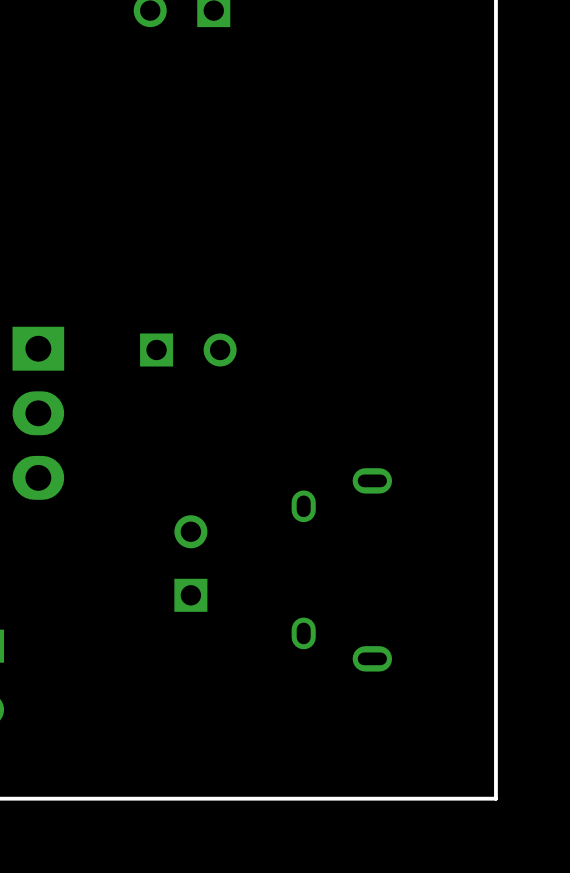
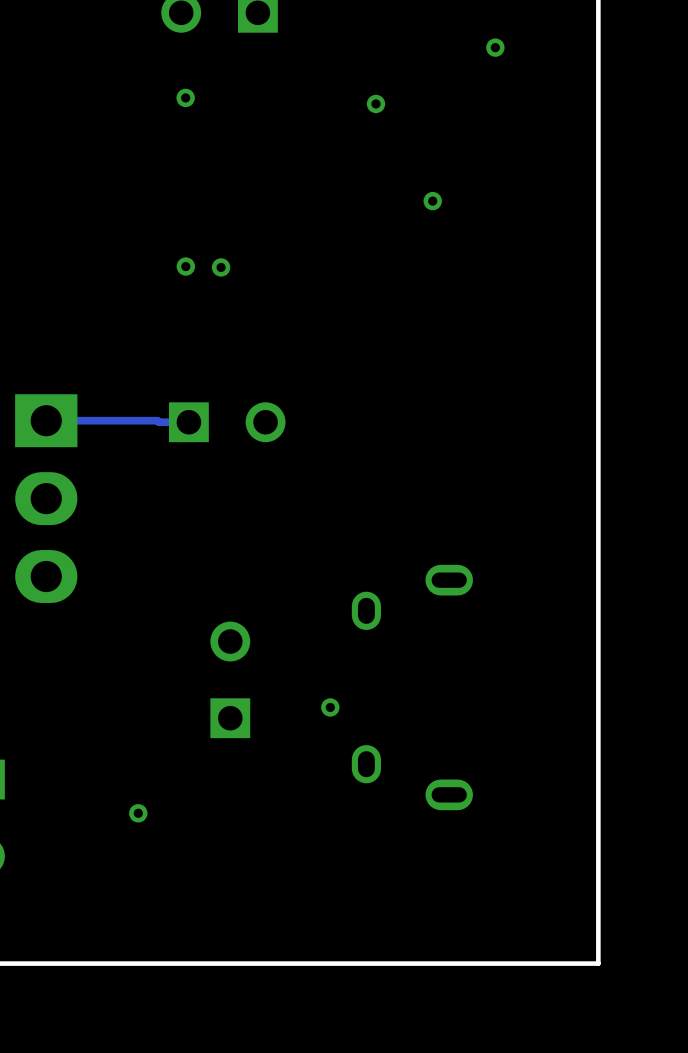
via: none -> (495, 47)
via: none -> (185, 97)
via: none -> (375, 103)
via: none -> (432, 201)
via: none -> (185, 266)
via: none -> (221, 267)
track: none -> (46, 420) (188, 422)
via: none -> (330, 707)
via: none -> (138, 813)

